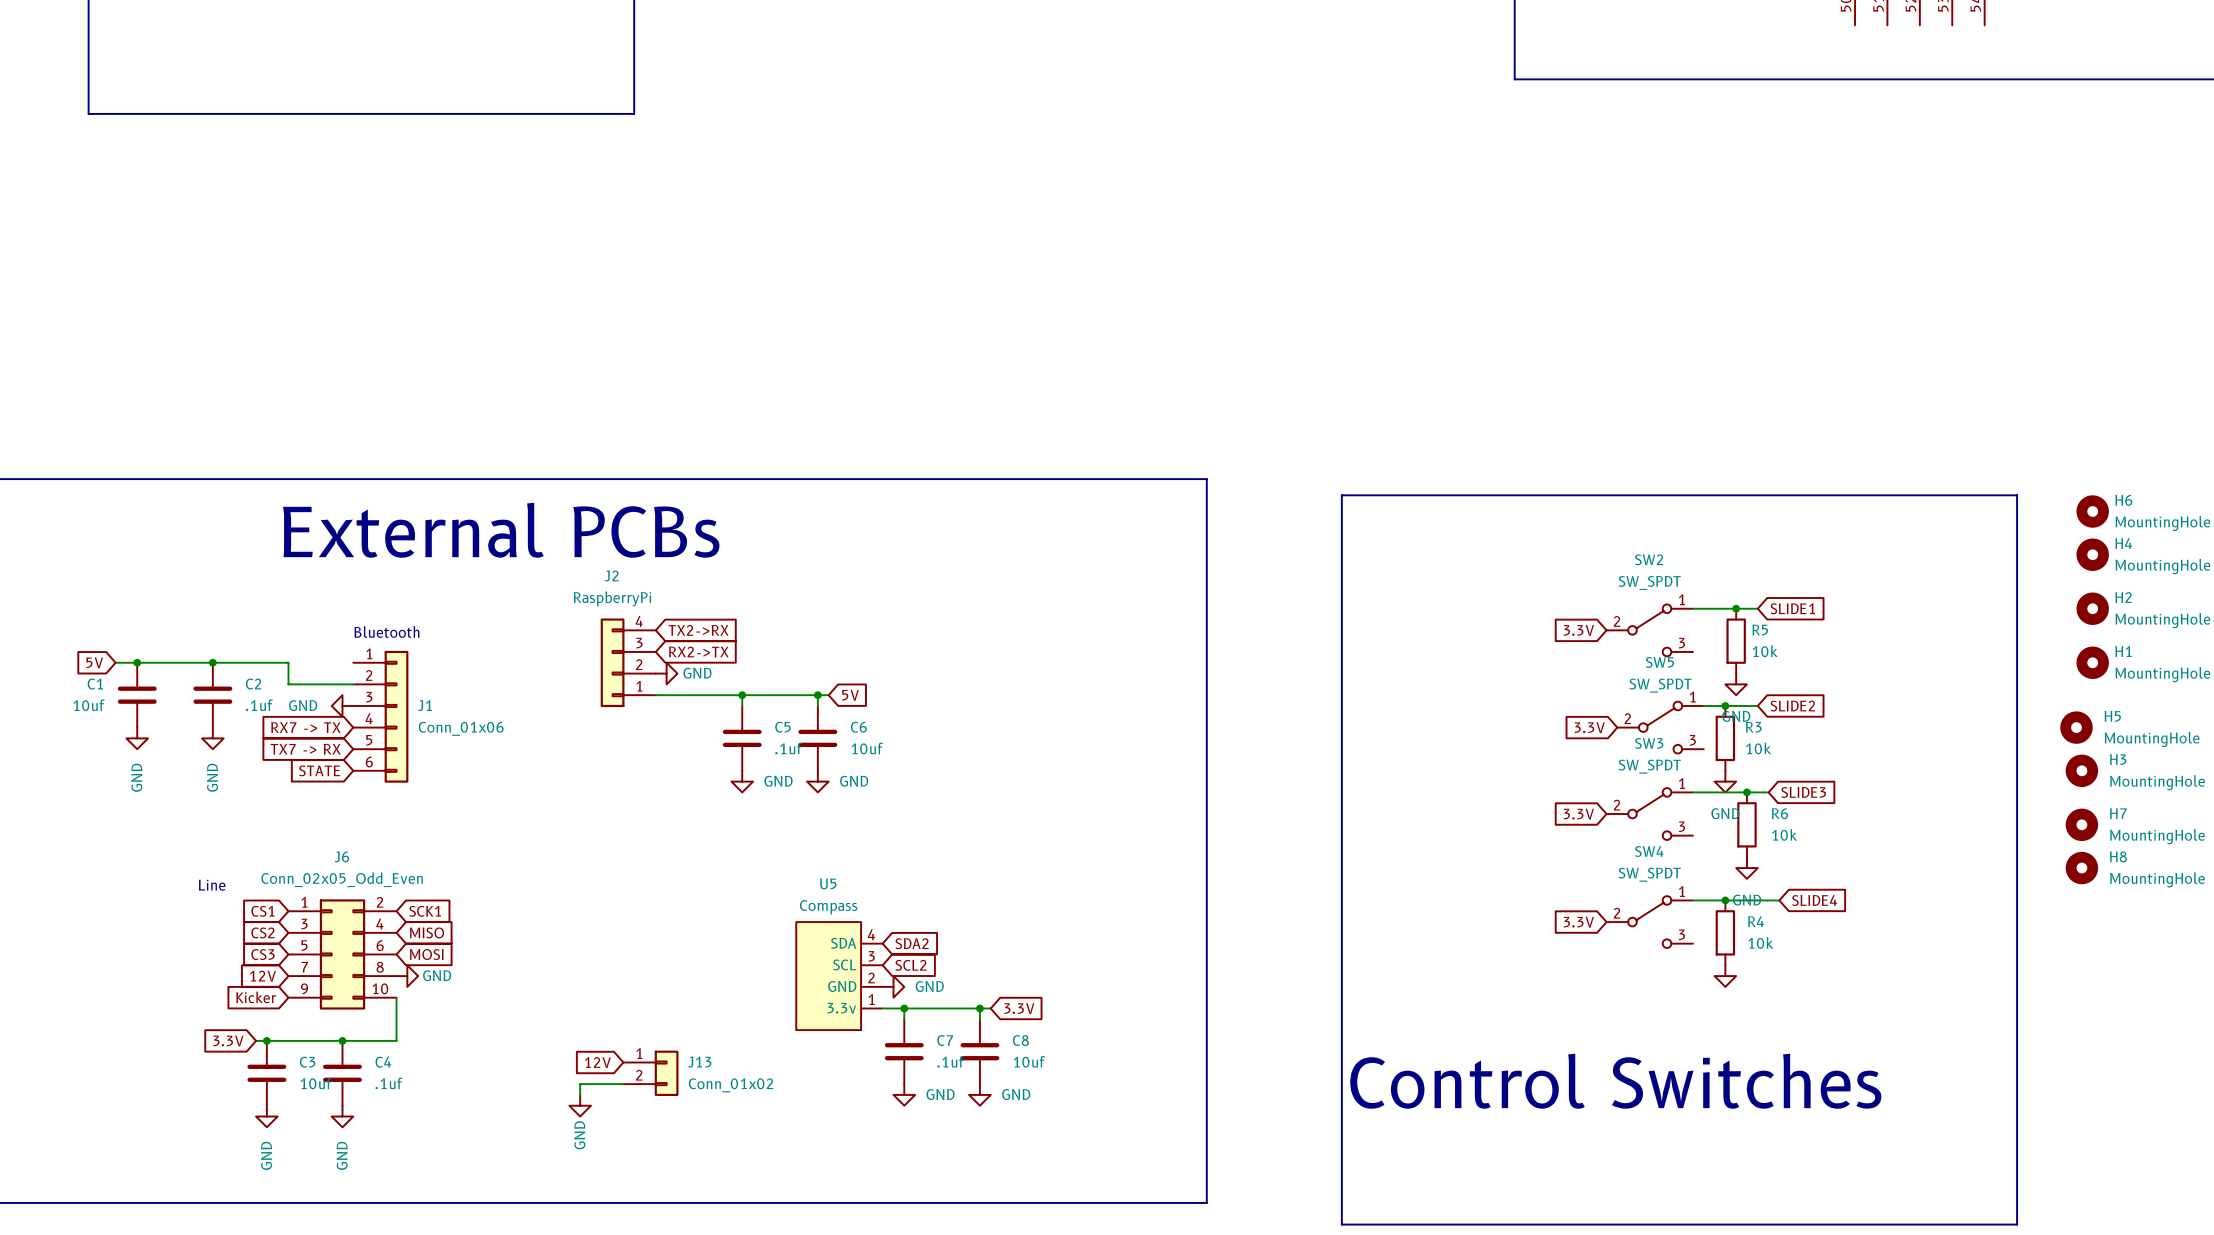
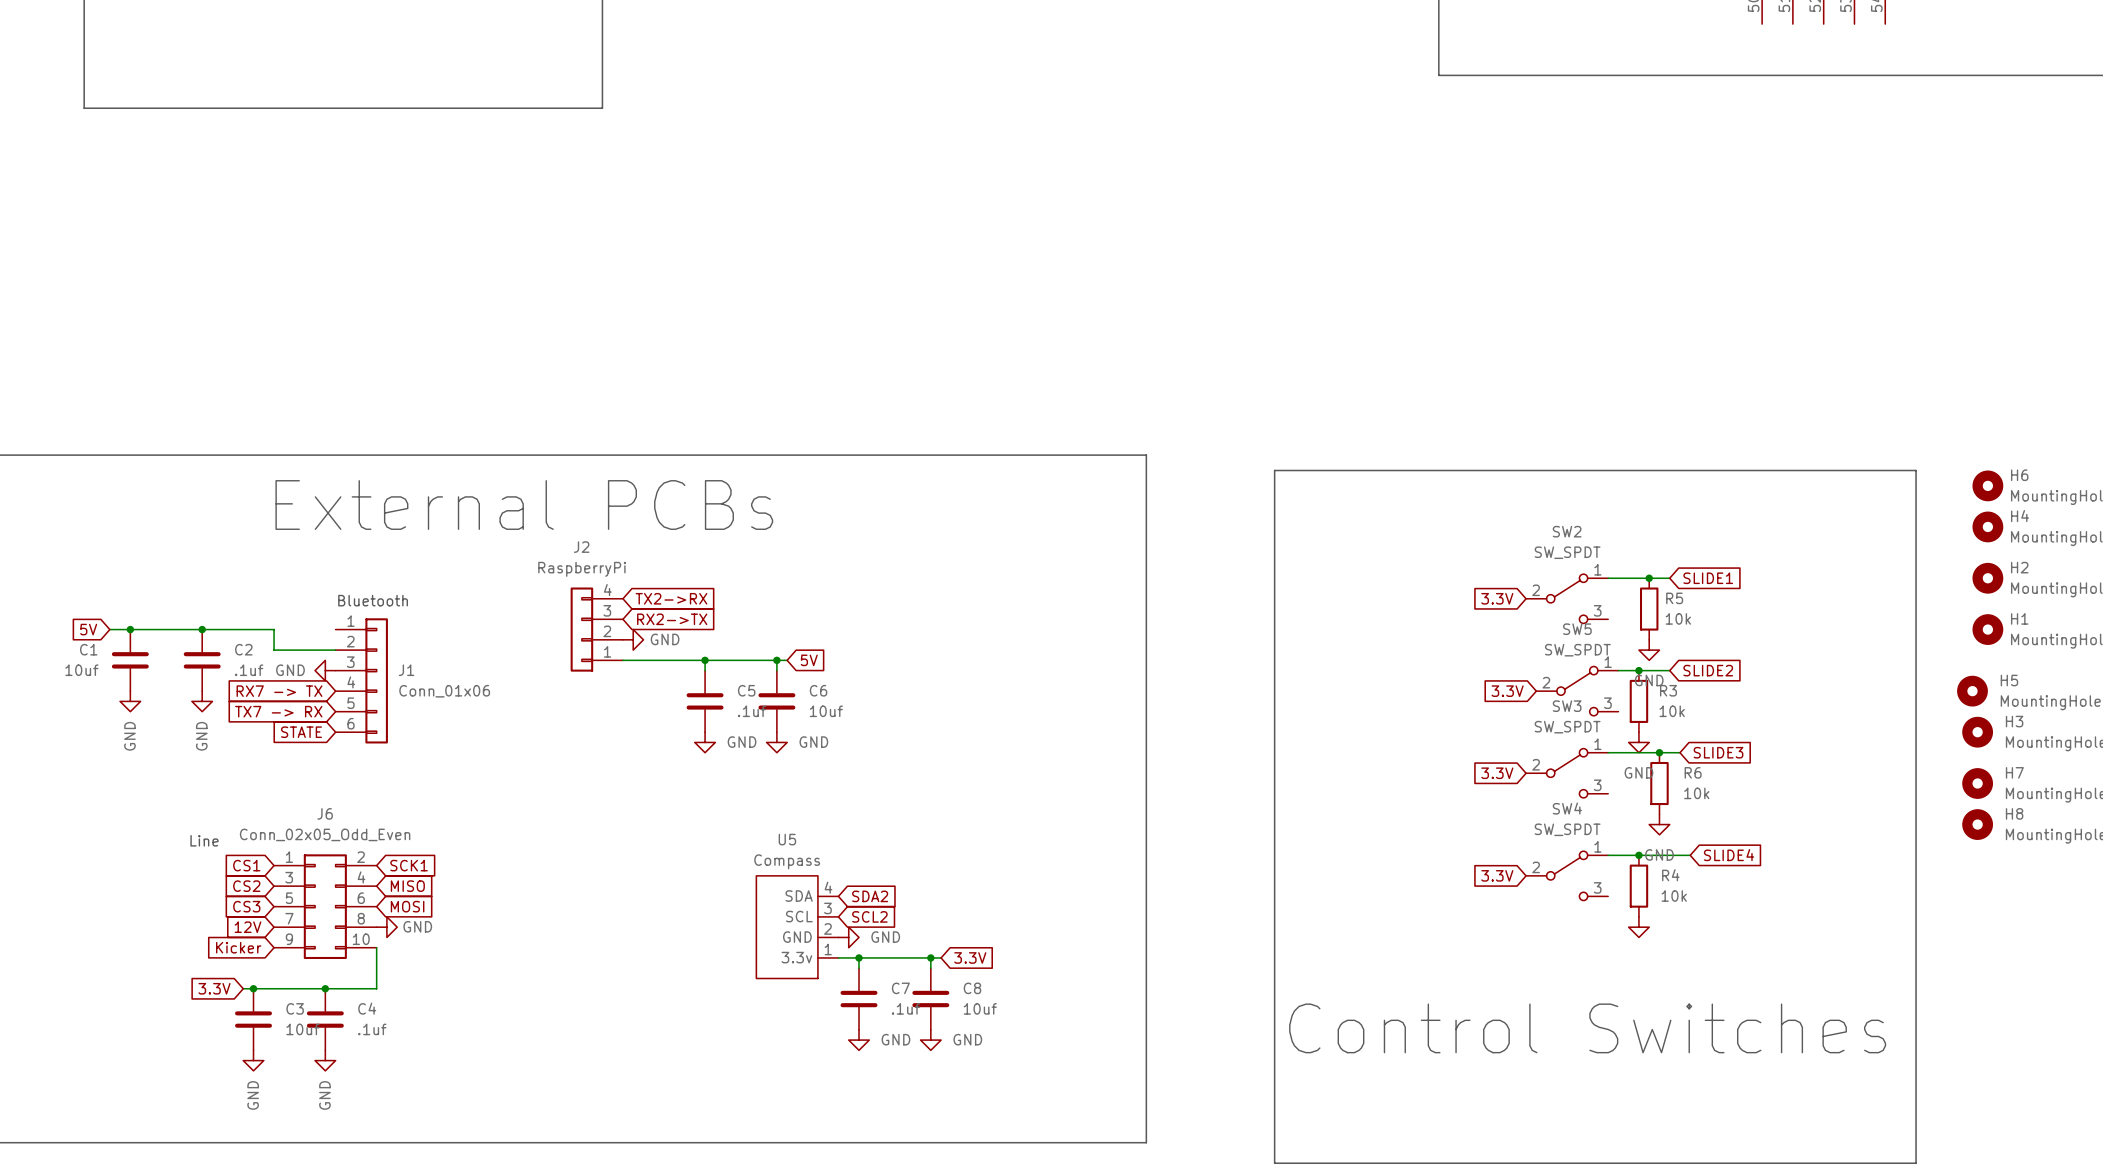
global label: 12V (597, 1062) -> none
J13: Conn_01x02 (650, 1073) -> none
wire: (623, 1084) (580, 1084) (580, 1094) -> none
power symbol: GND (580, 1105) -> none

